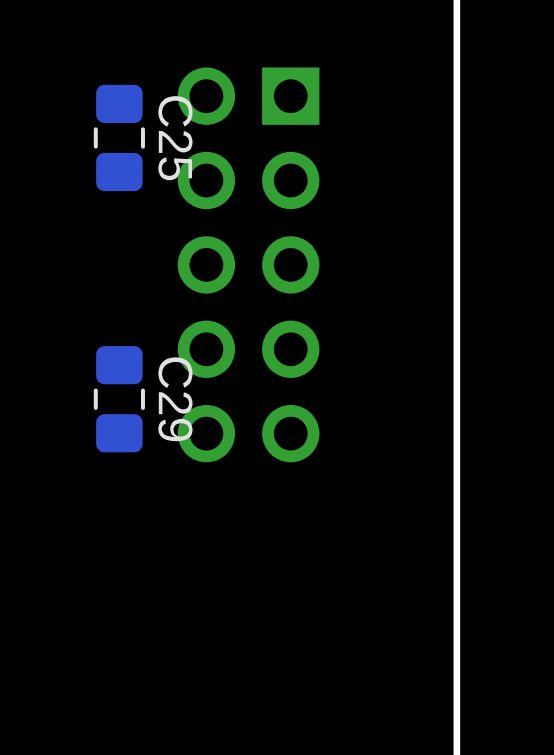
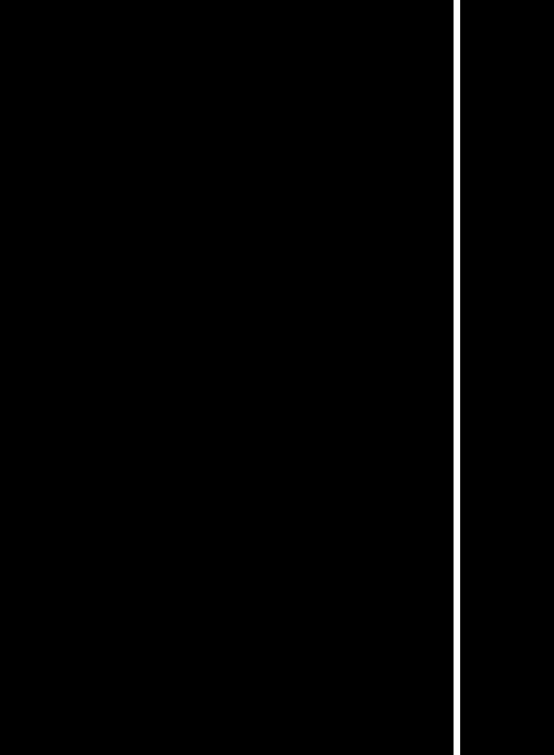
C25: (119, 137) -> none
part: (248, 264) -> none
C29: (119, 399) -> none

